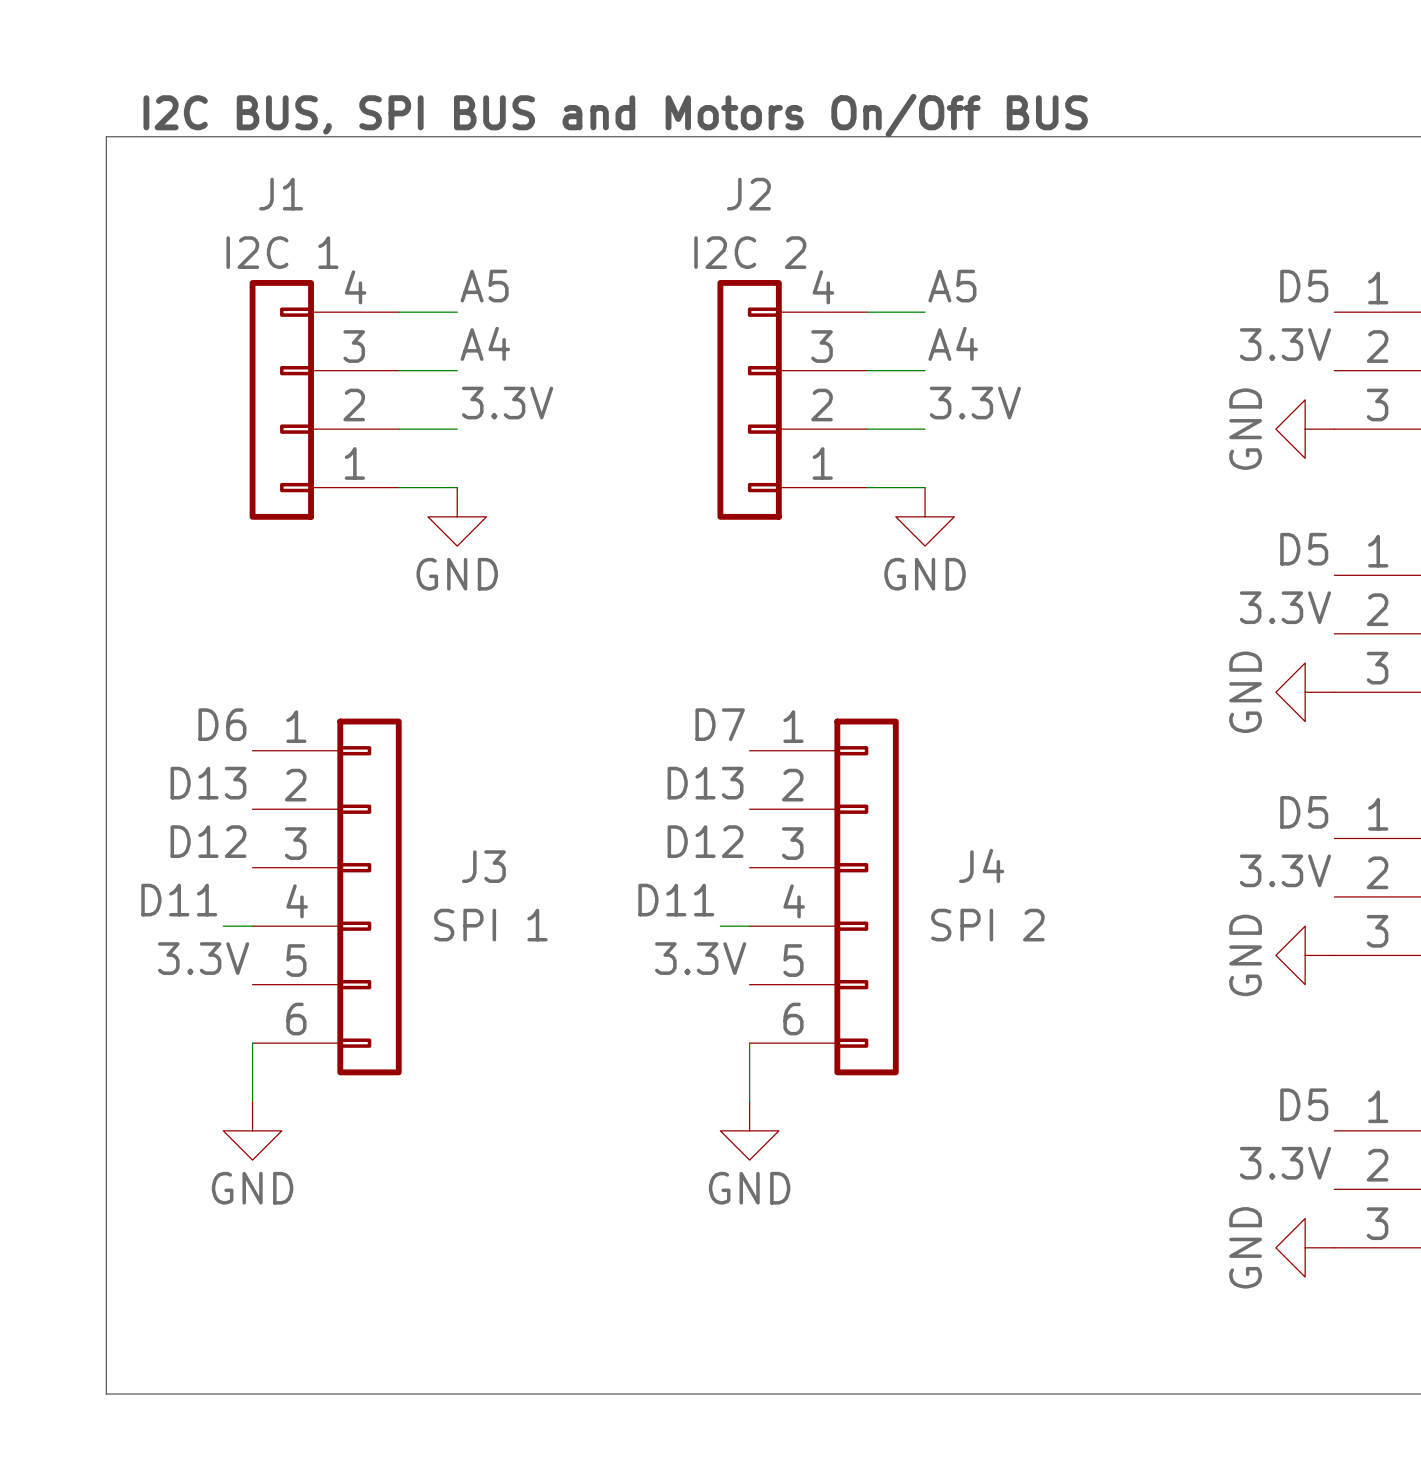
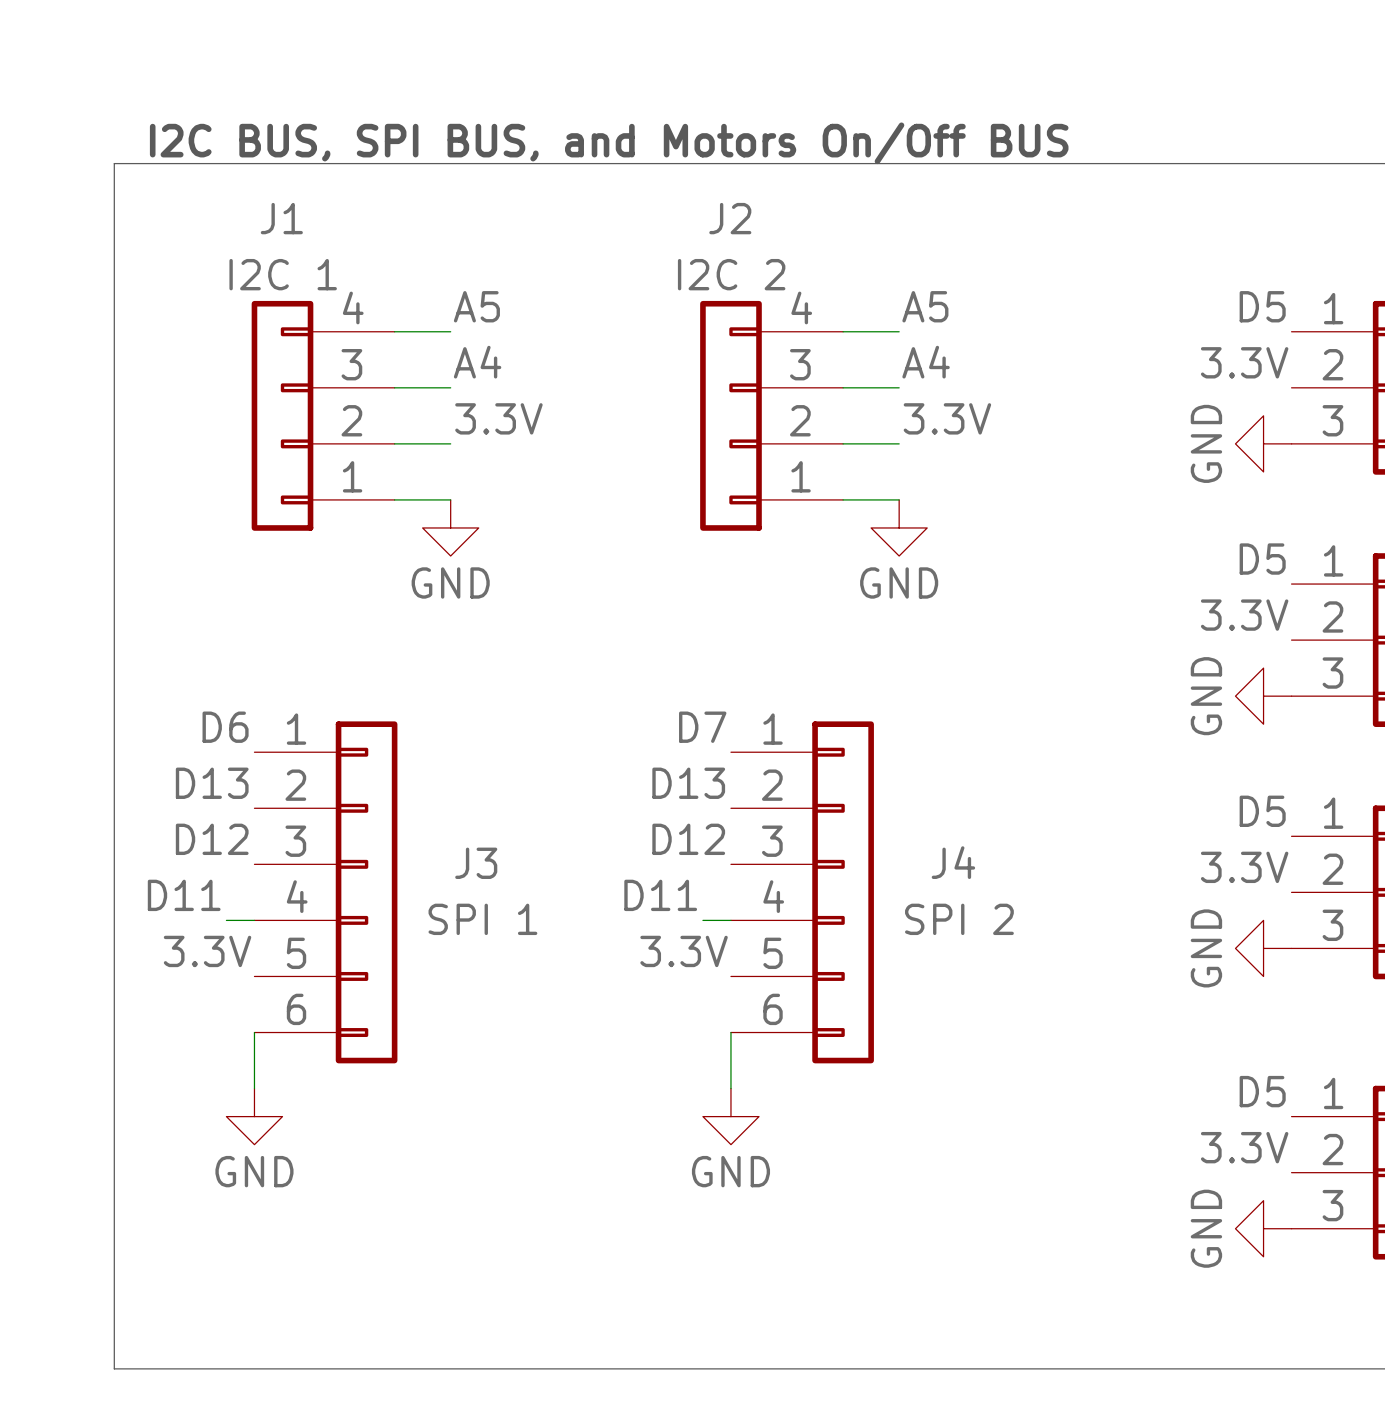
text: I2C BUS, SPI BUS and Motors On/Off BUS (615, 115) -> I2C BUS, SPI BUS, and Motors On/Off BUS (609, 143)

